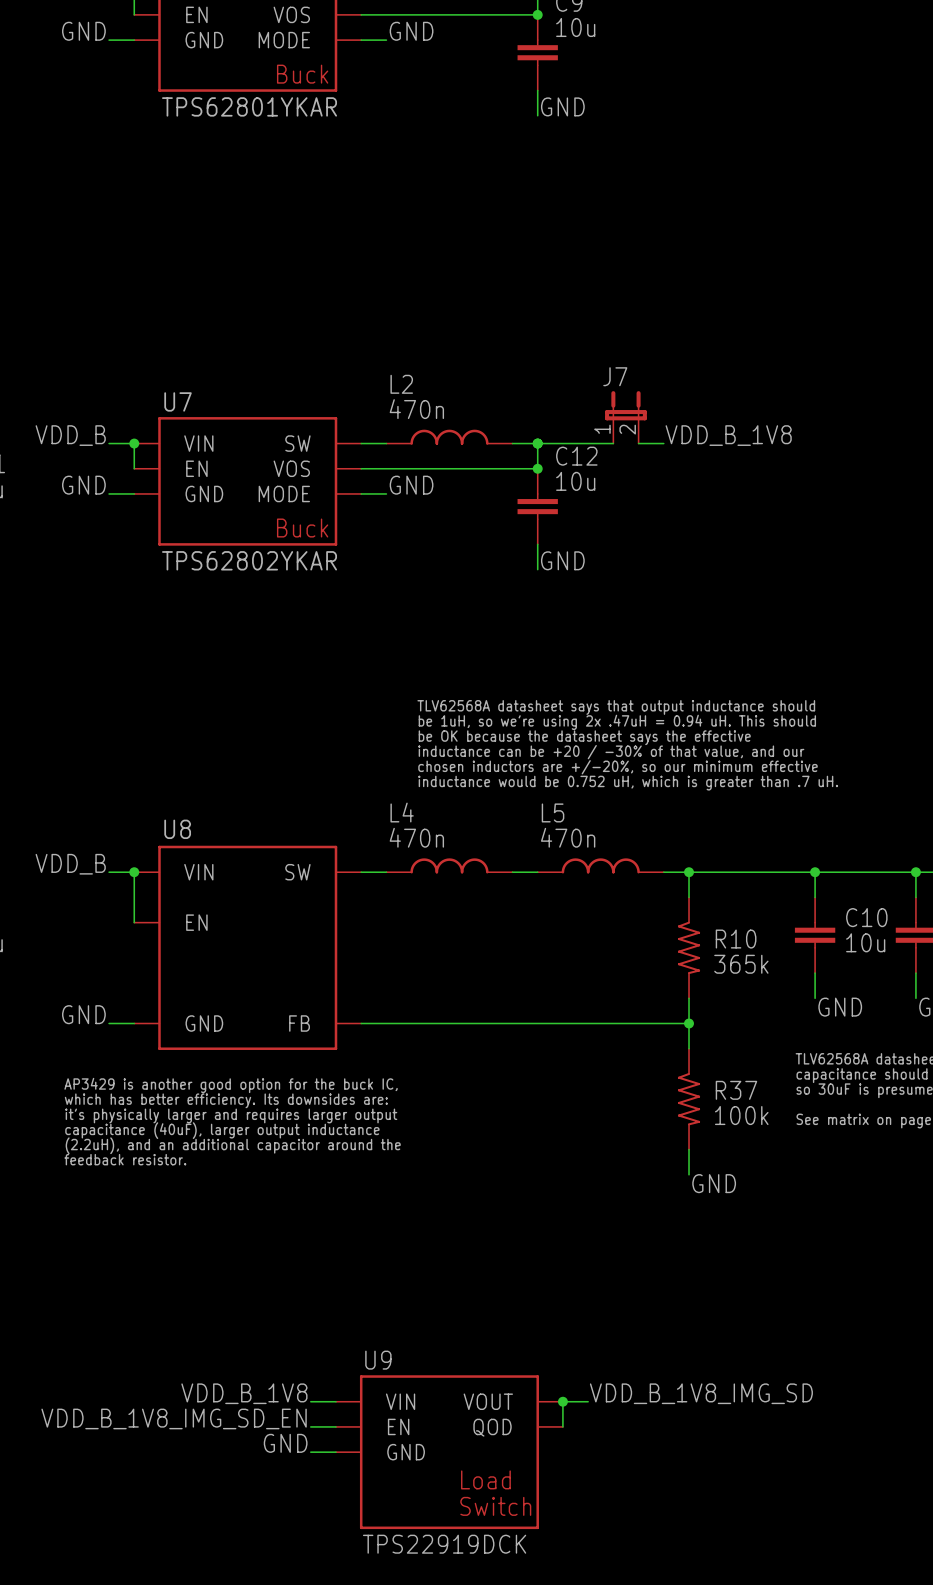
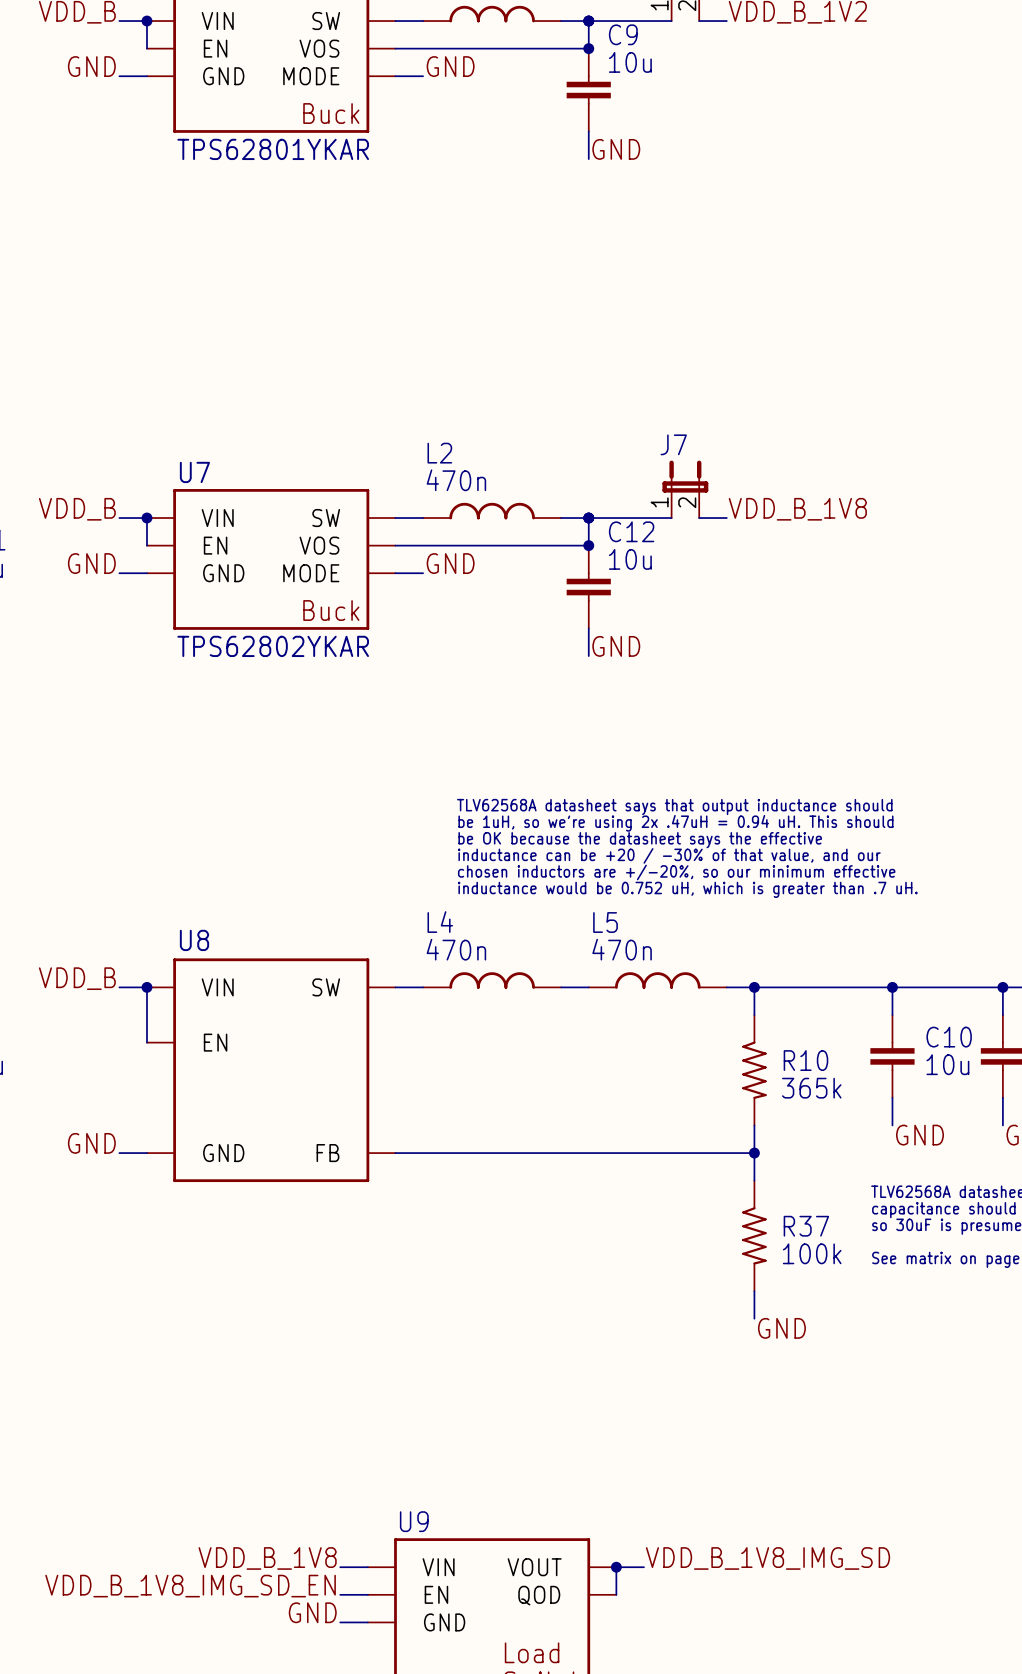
text: AP3429 is another good option for the buck IC, (231, 1085) -> none
text: which has better efficiency. Its downsides are: (226, 1100) -> none
text: it's physically larger and requires larger output (231, 1115) -> none
text: capacitance (40uF), larger output inductance (222, 1130) -> none
text: (2.2uH), and an additional capacitor around the (233, 1145) -> none
text: feedback resistor. (125, 1159) -> none

